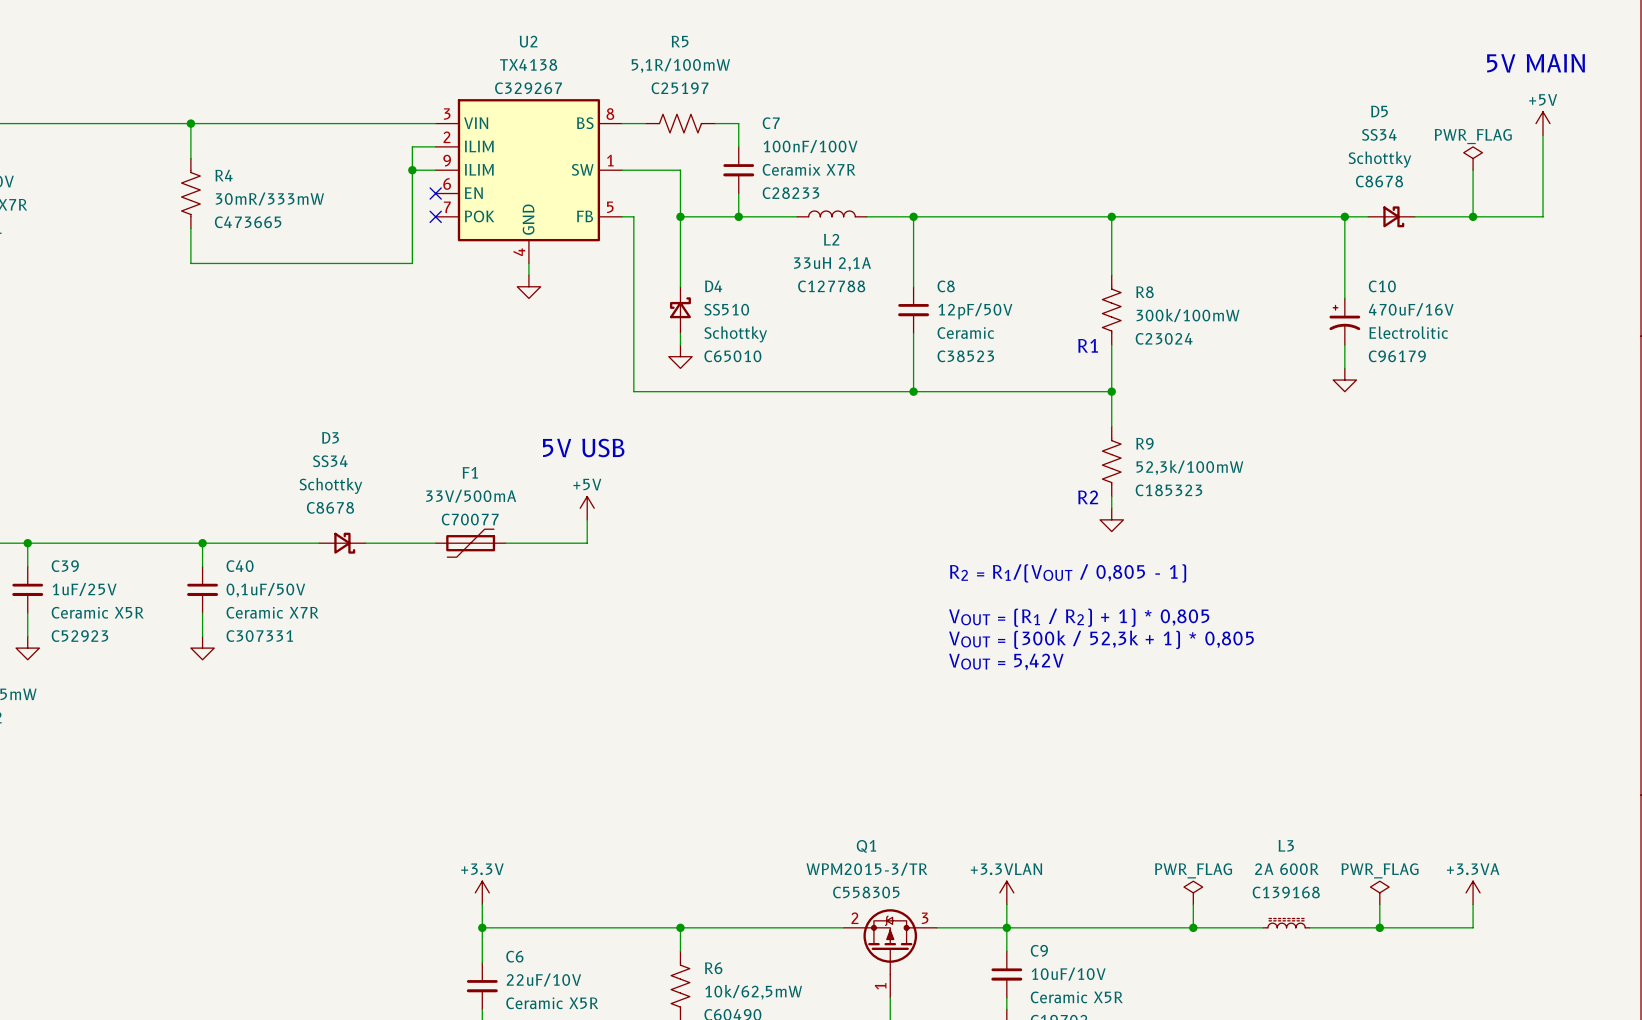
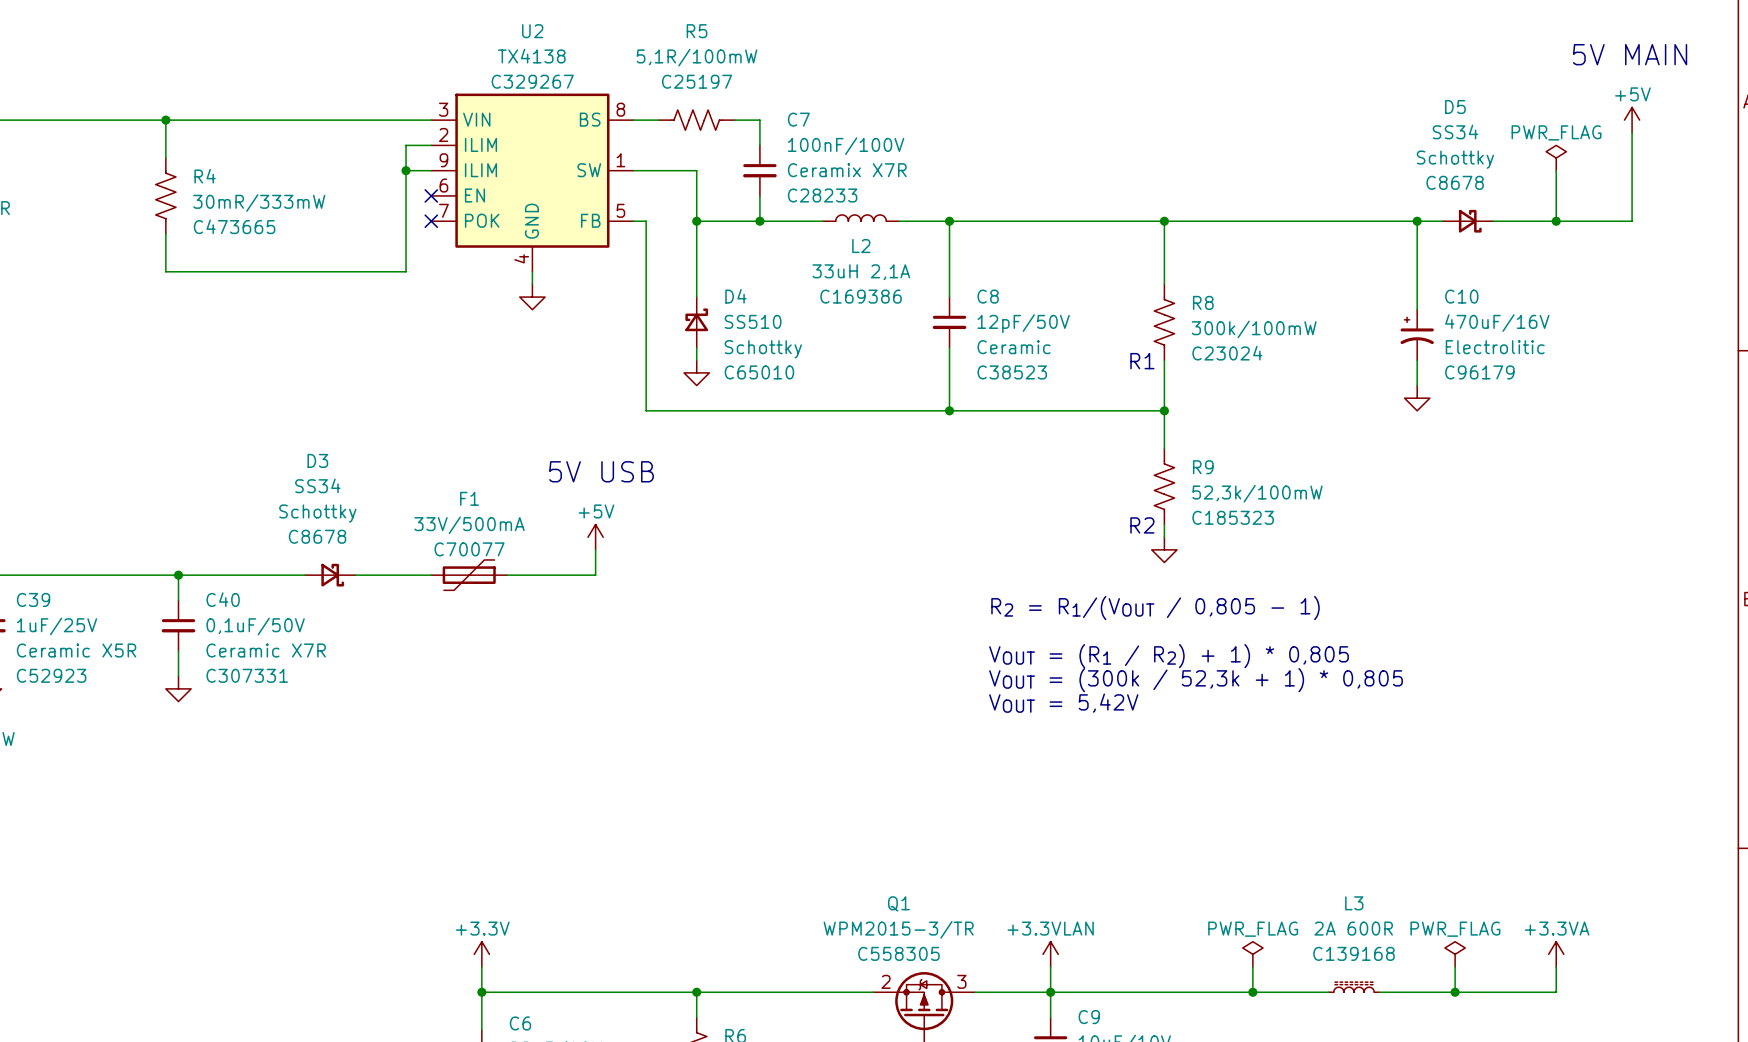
L2 text: C127788 (831, 286) -> C169386 (861, 296)

